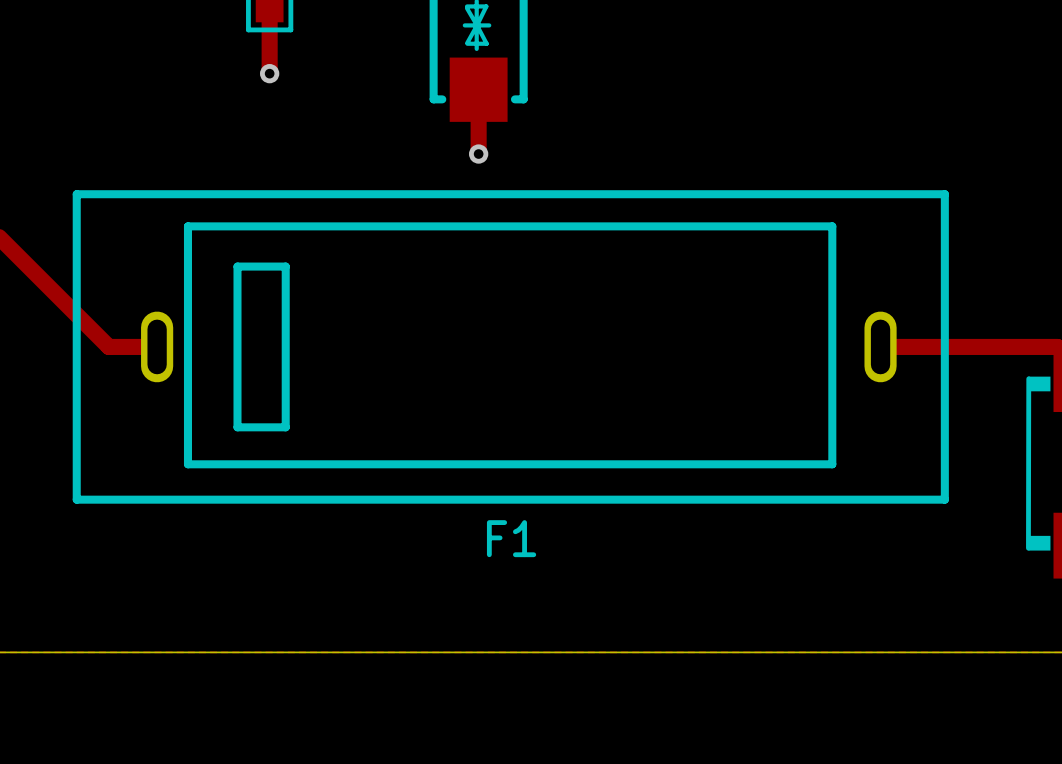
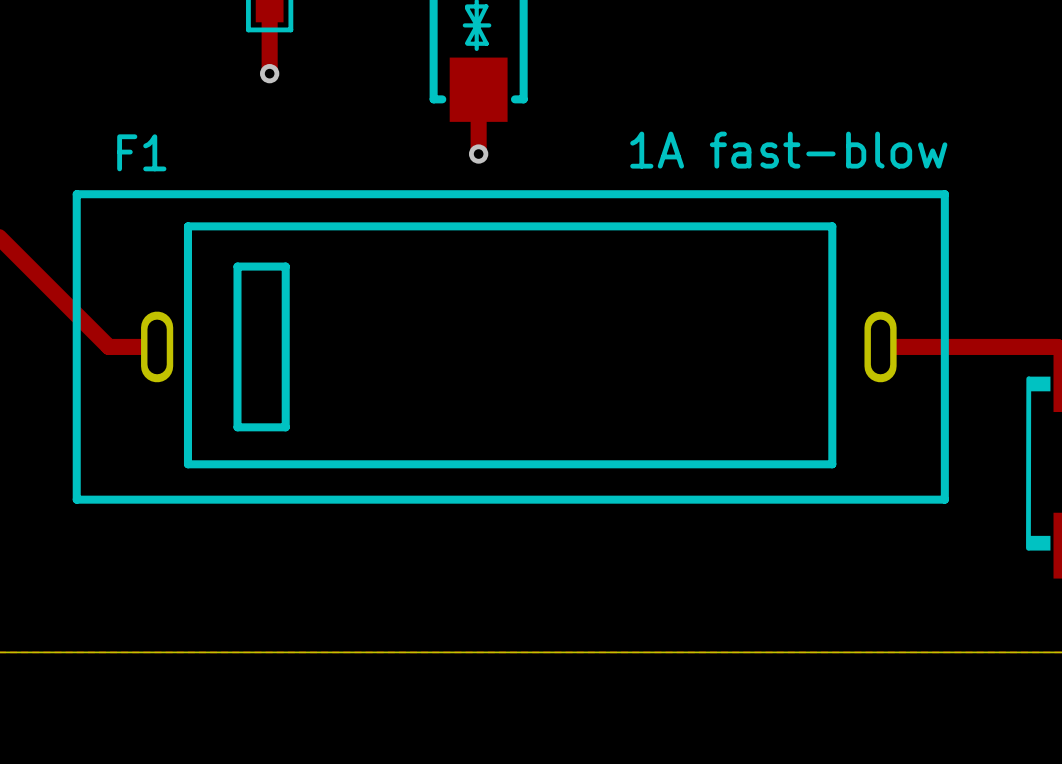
text: none -> 1A fast-blow (788, 150)
F1 name position: F1 (511, 538) -> F1 (141, 152)

